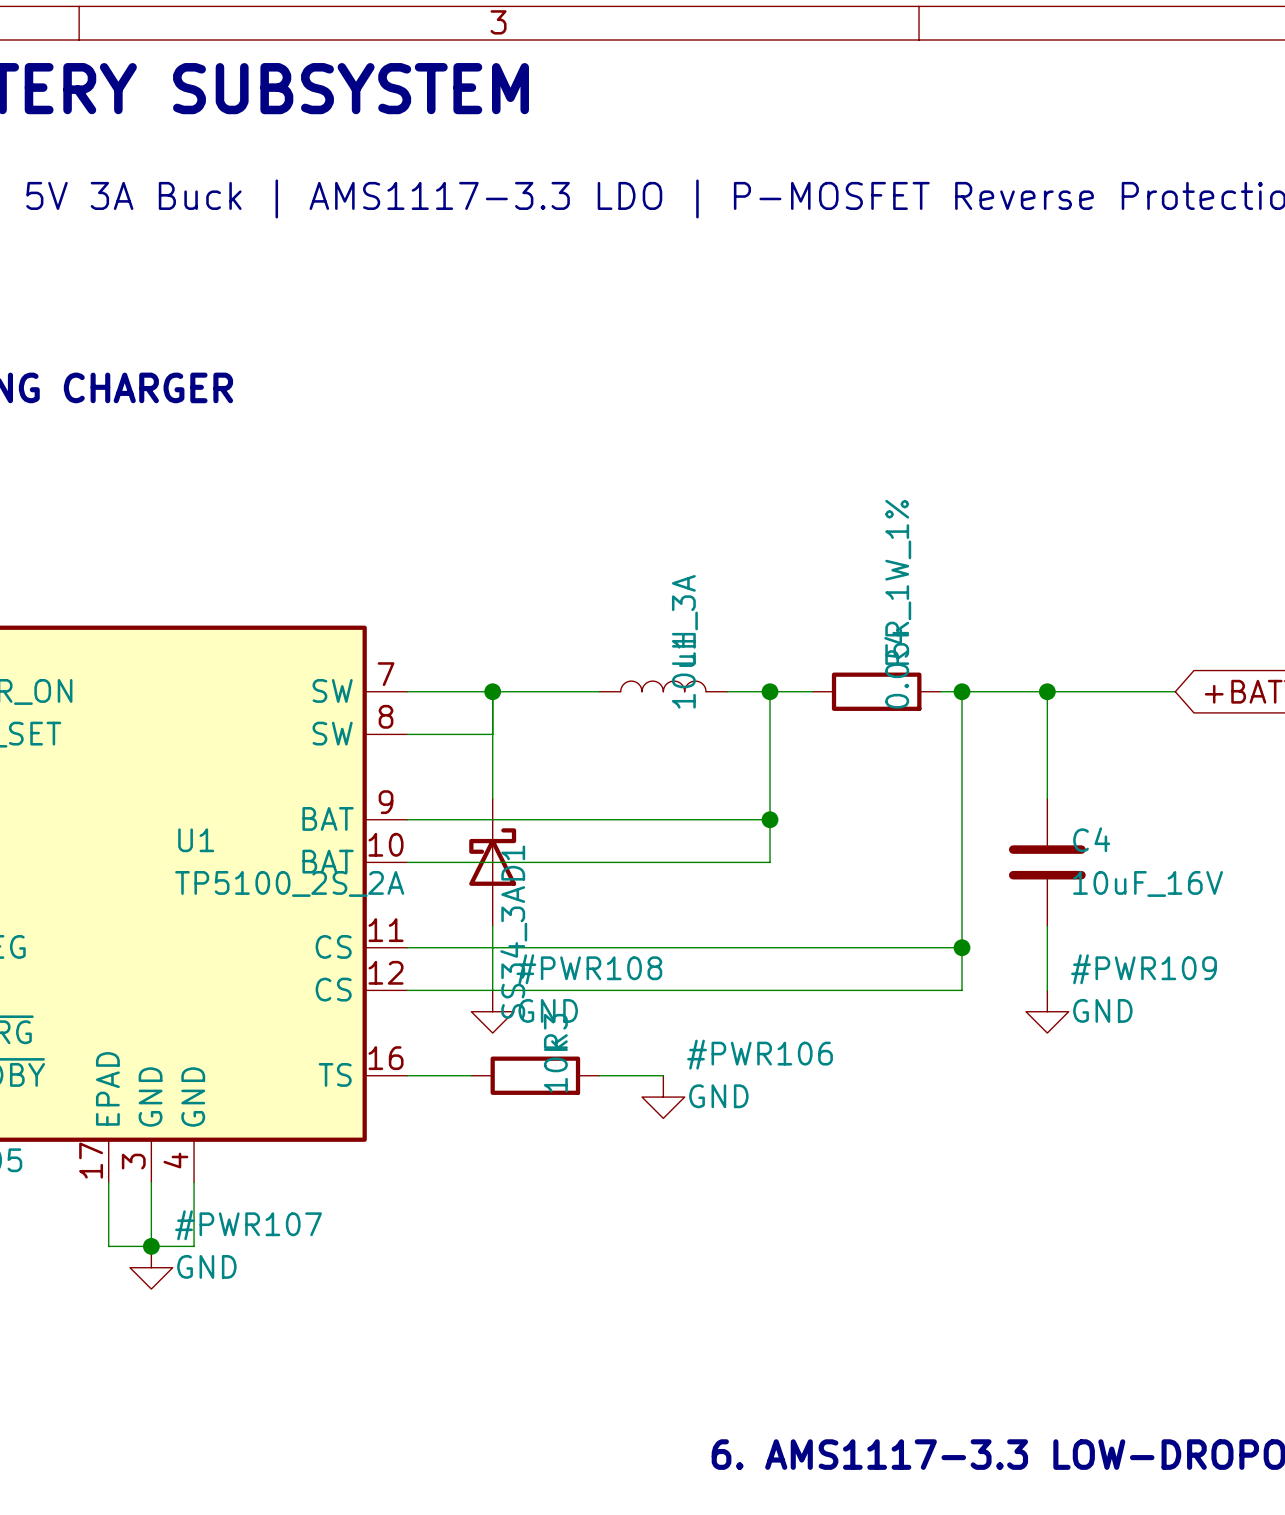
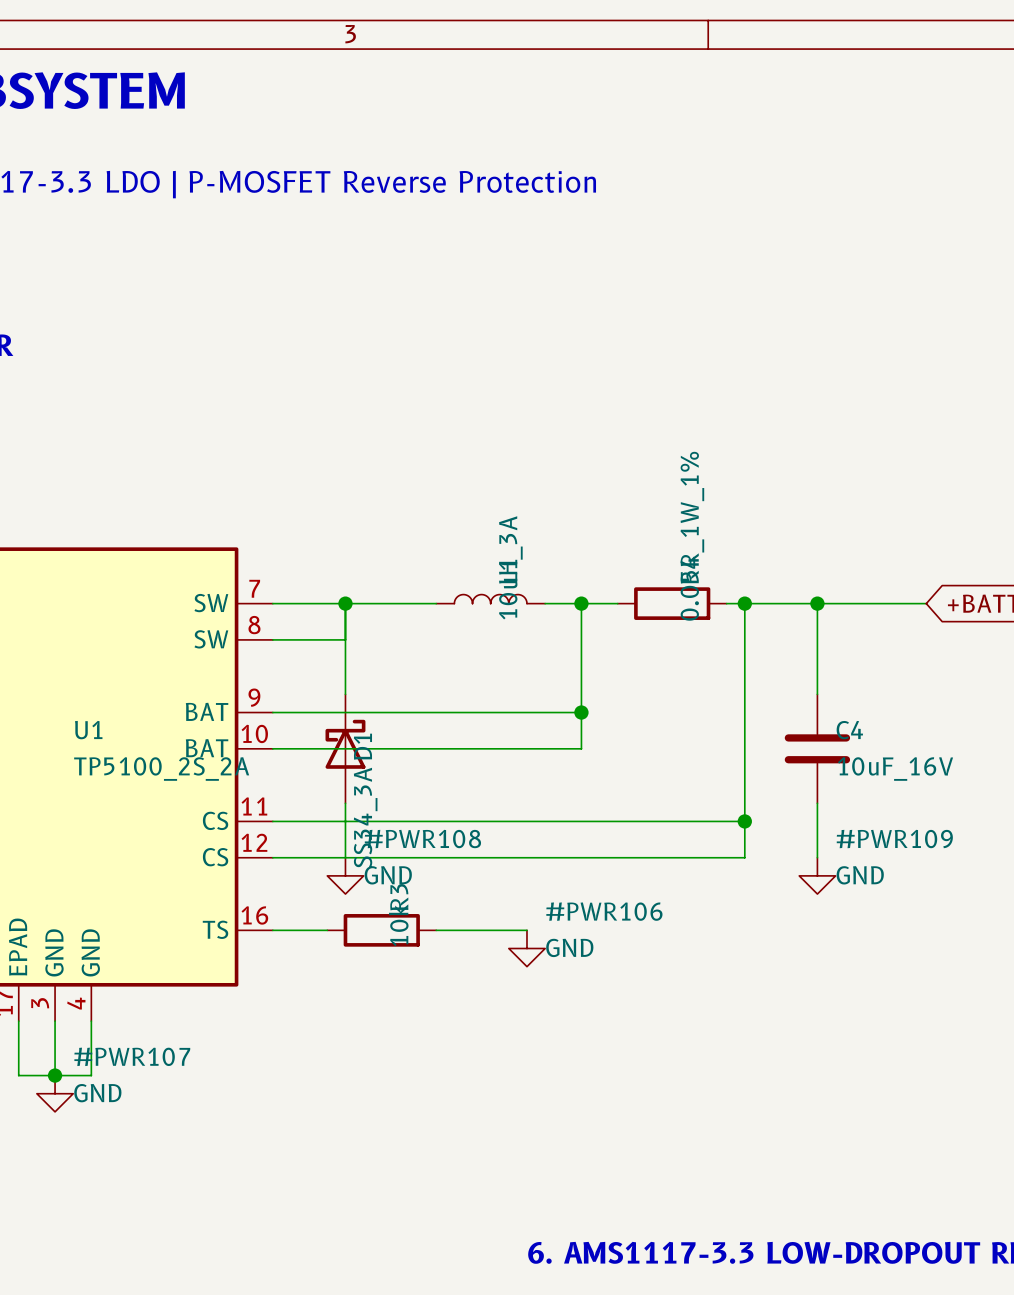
wire: none -> (490, 930) (526, 930)
#PWR106 position: GND (663, 1097) -> GND (526, 948)

